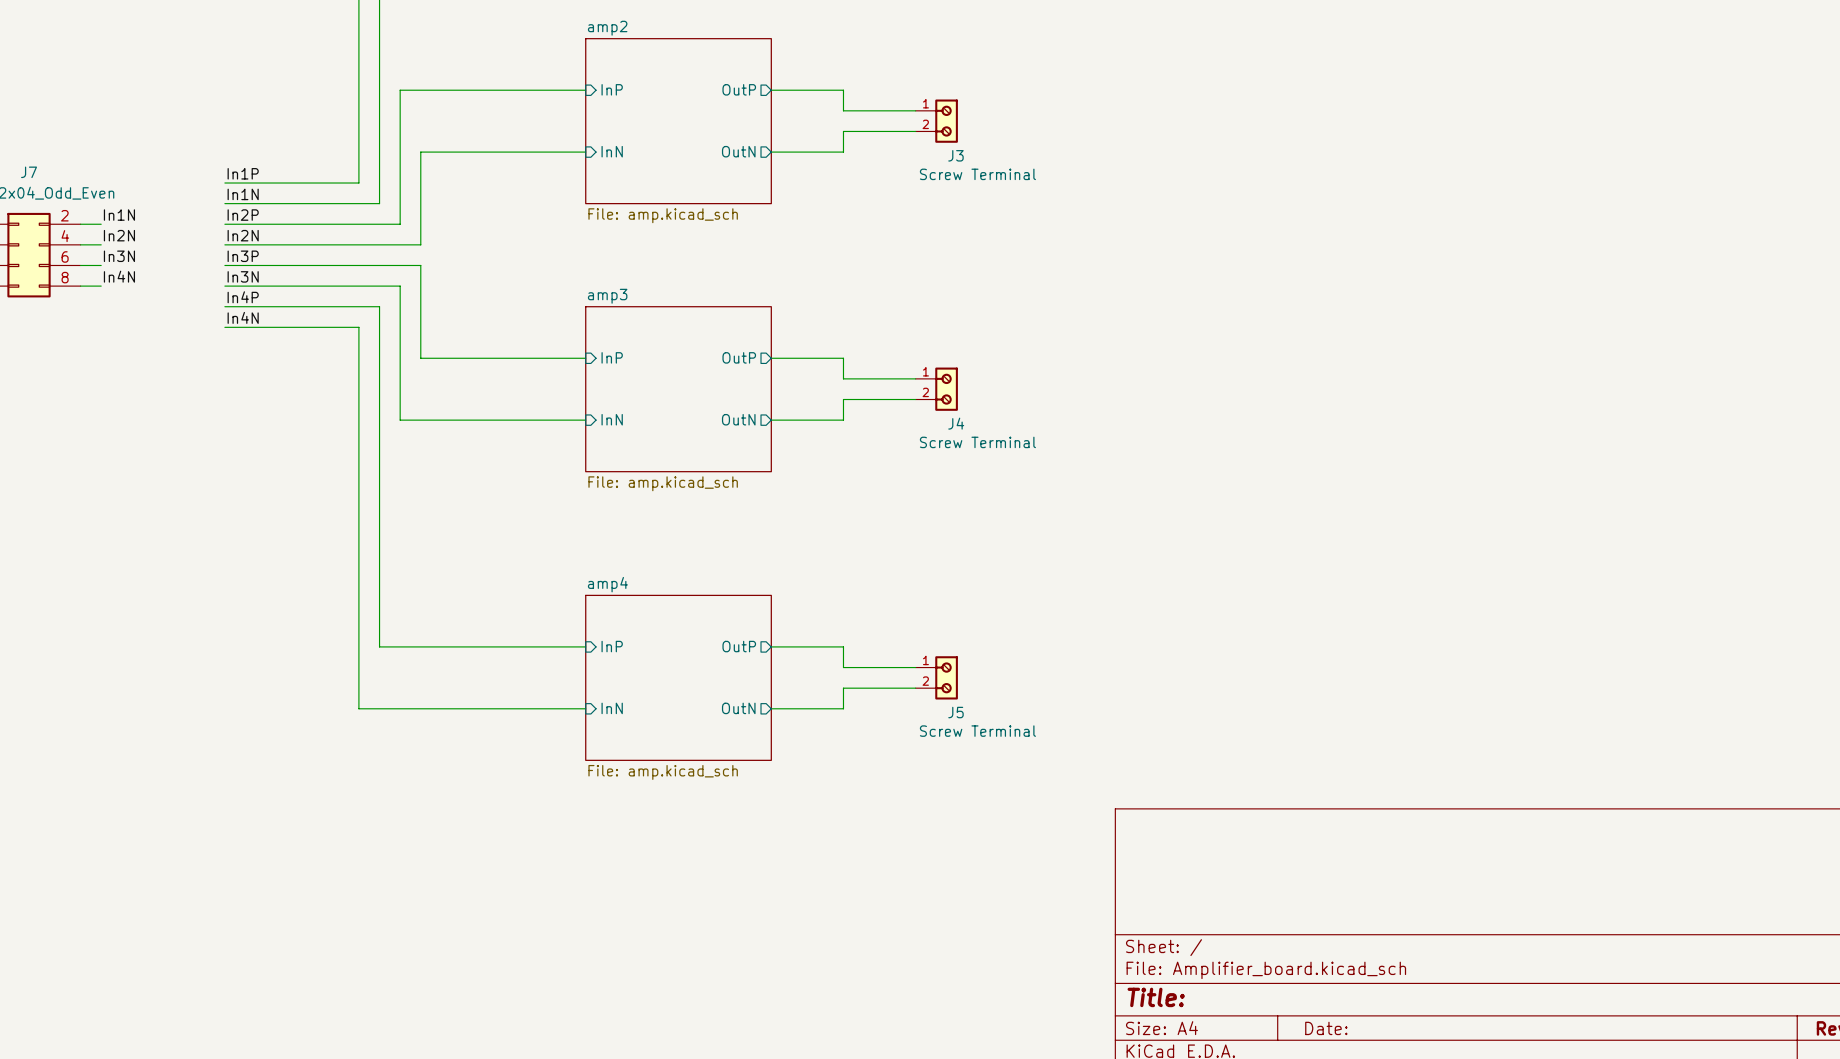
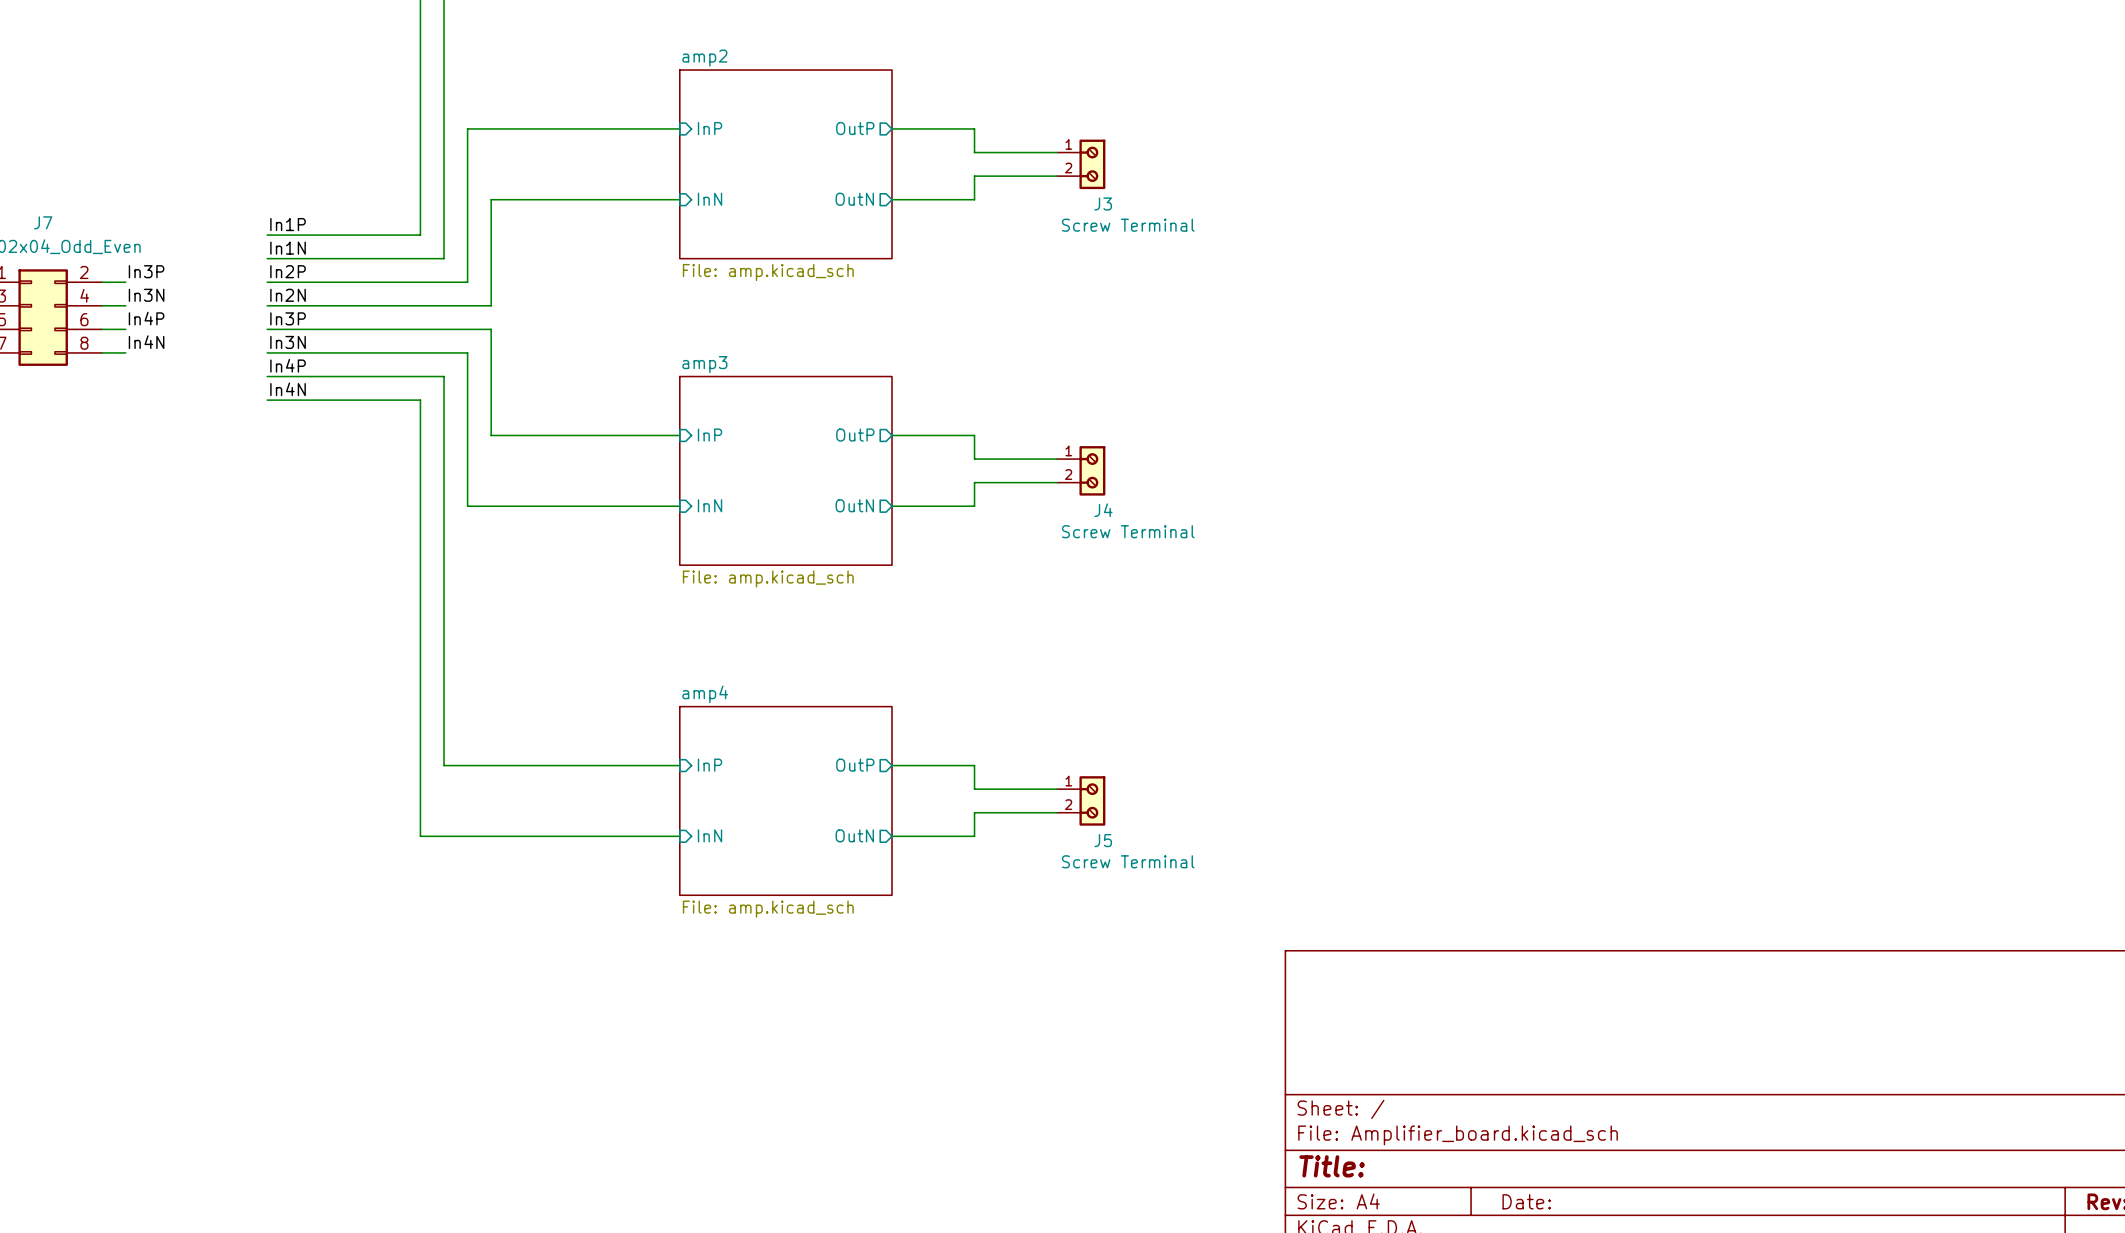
label: In1N (119, 215) -> In3P (146, 271)
label: In2N (119, 235) -> In3N (146, 295)
label: In3N (119, 256) -> In4P (146, 318)

